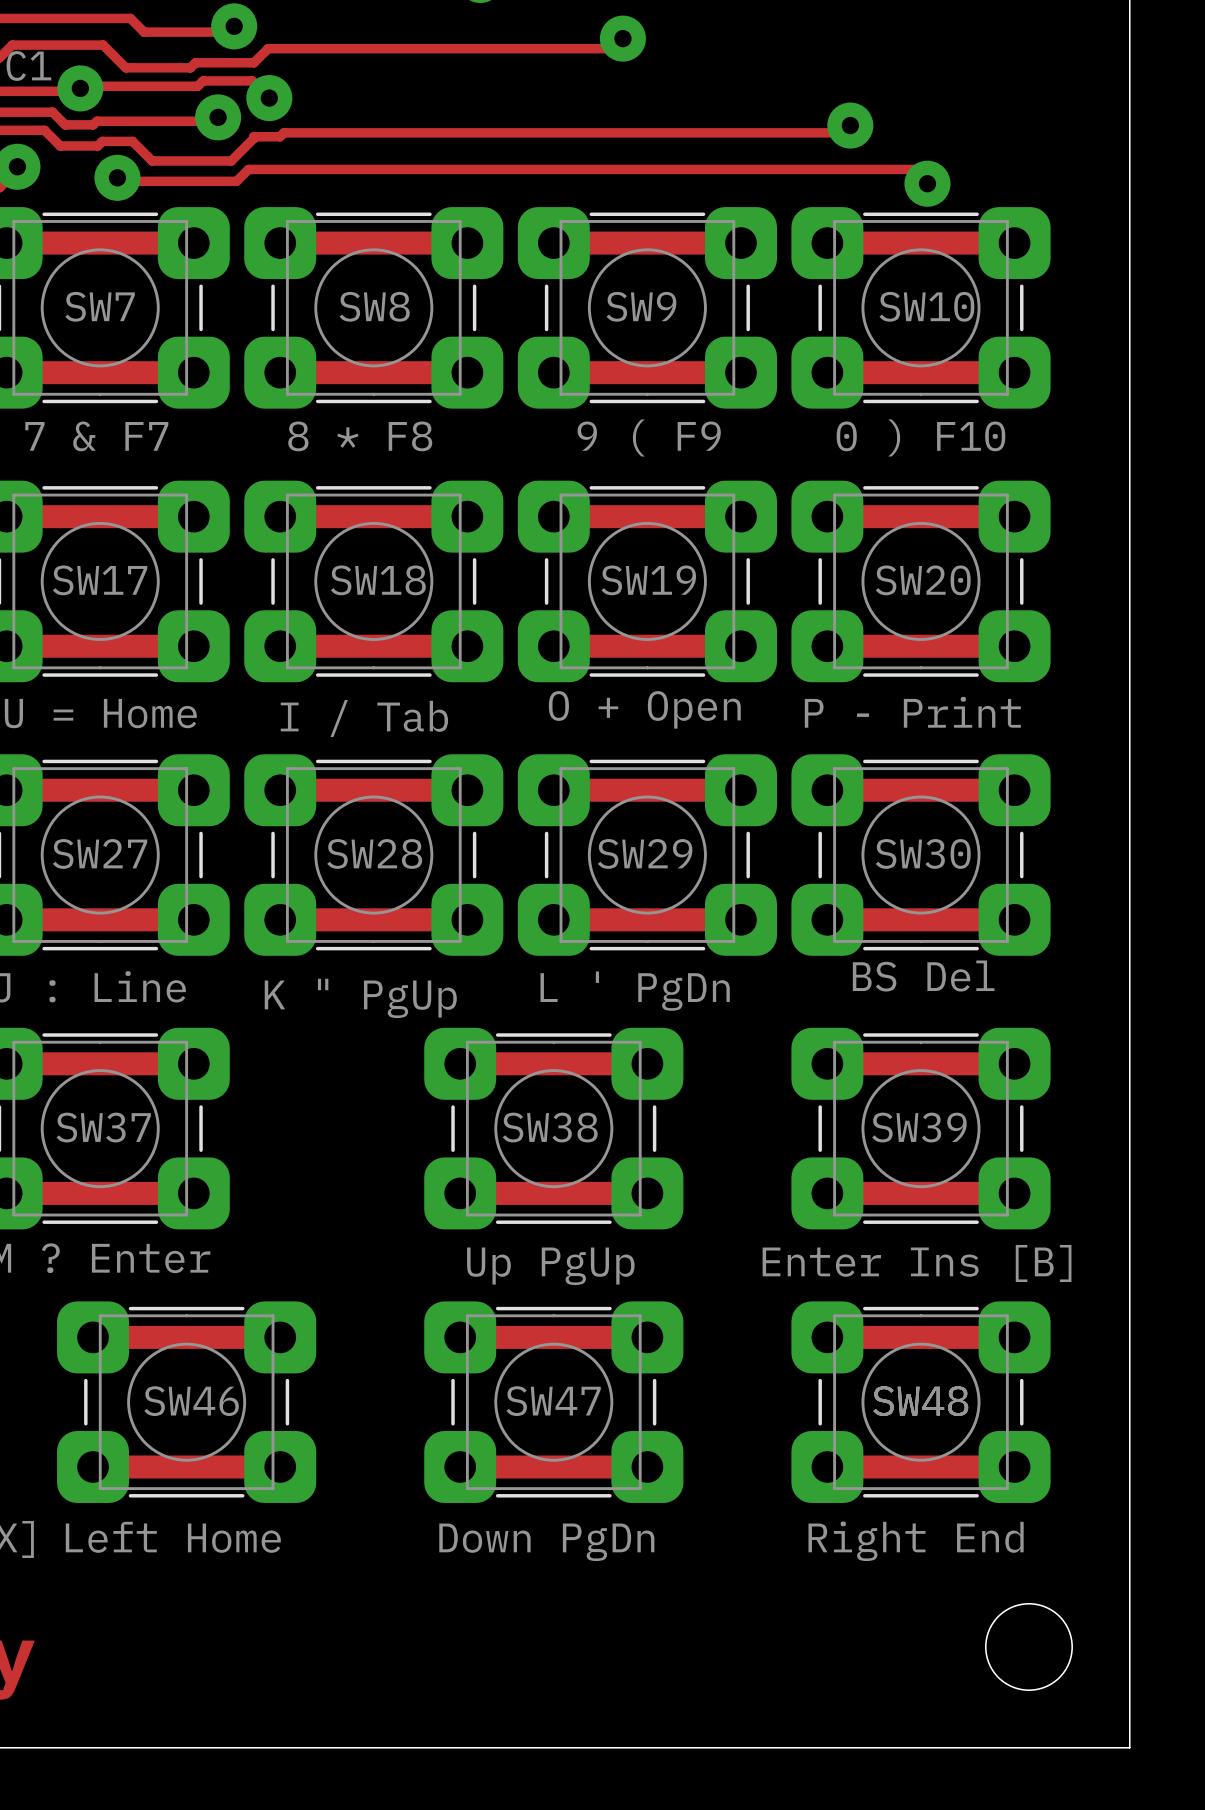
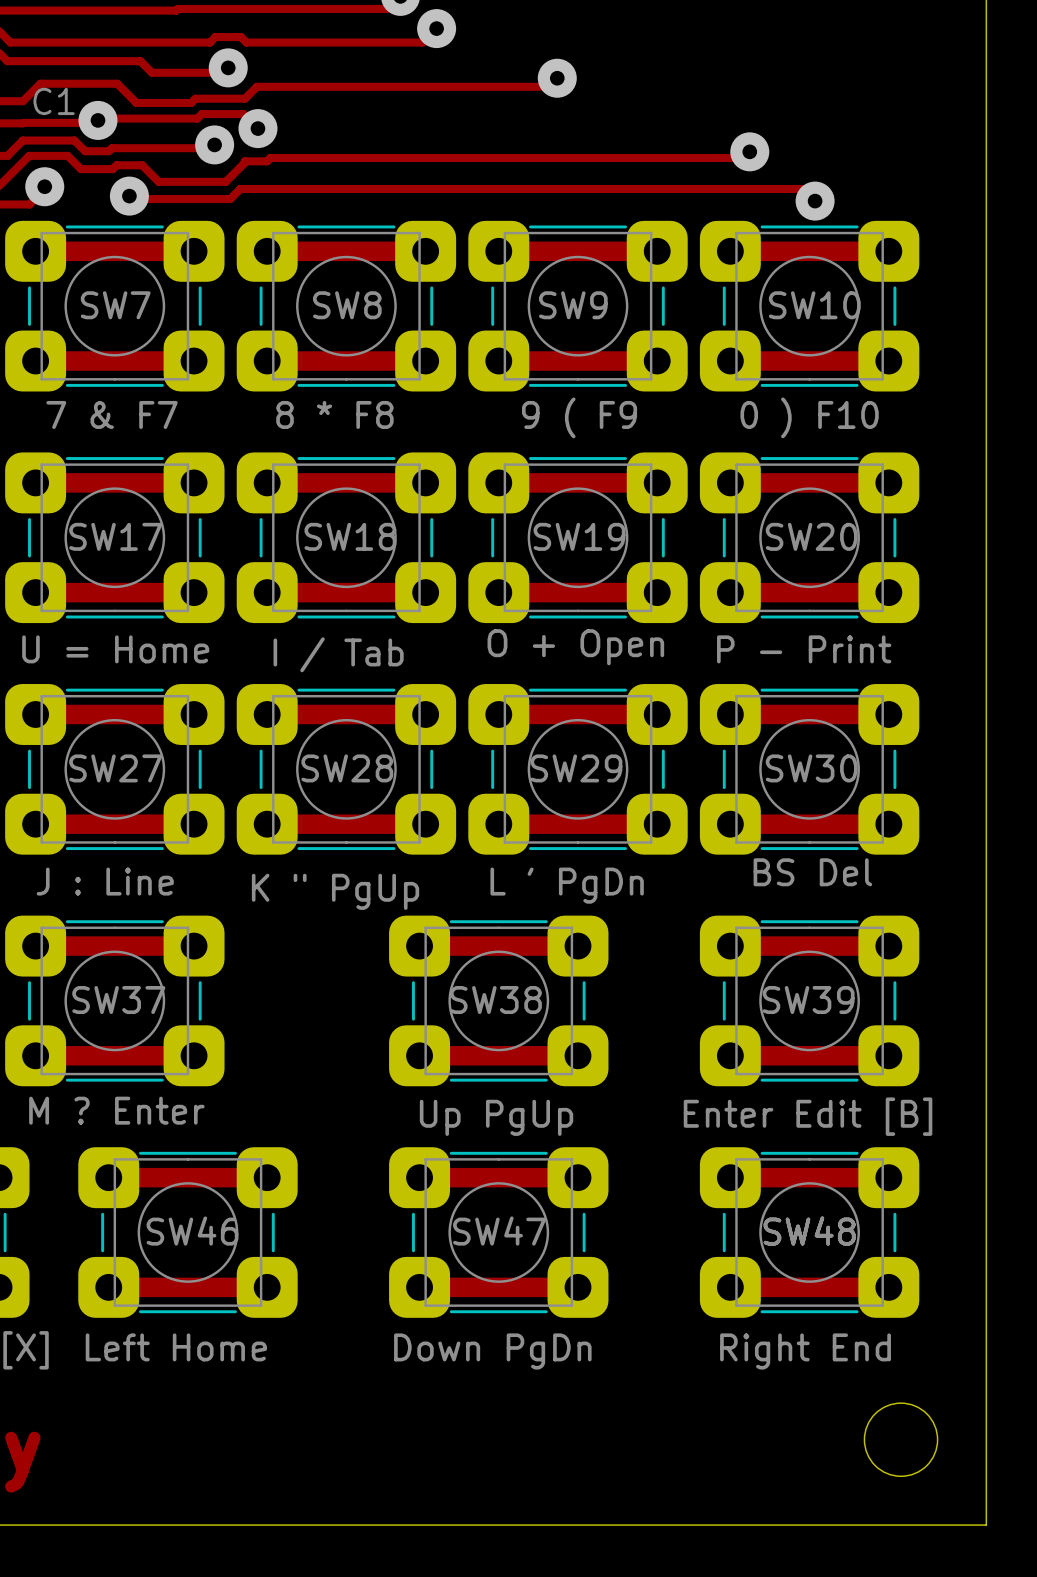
SW39 value: Enter Ins [B] (917, 1263) -> Enter Edit [B] (808, 1116)

